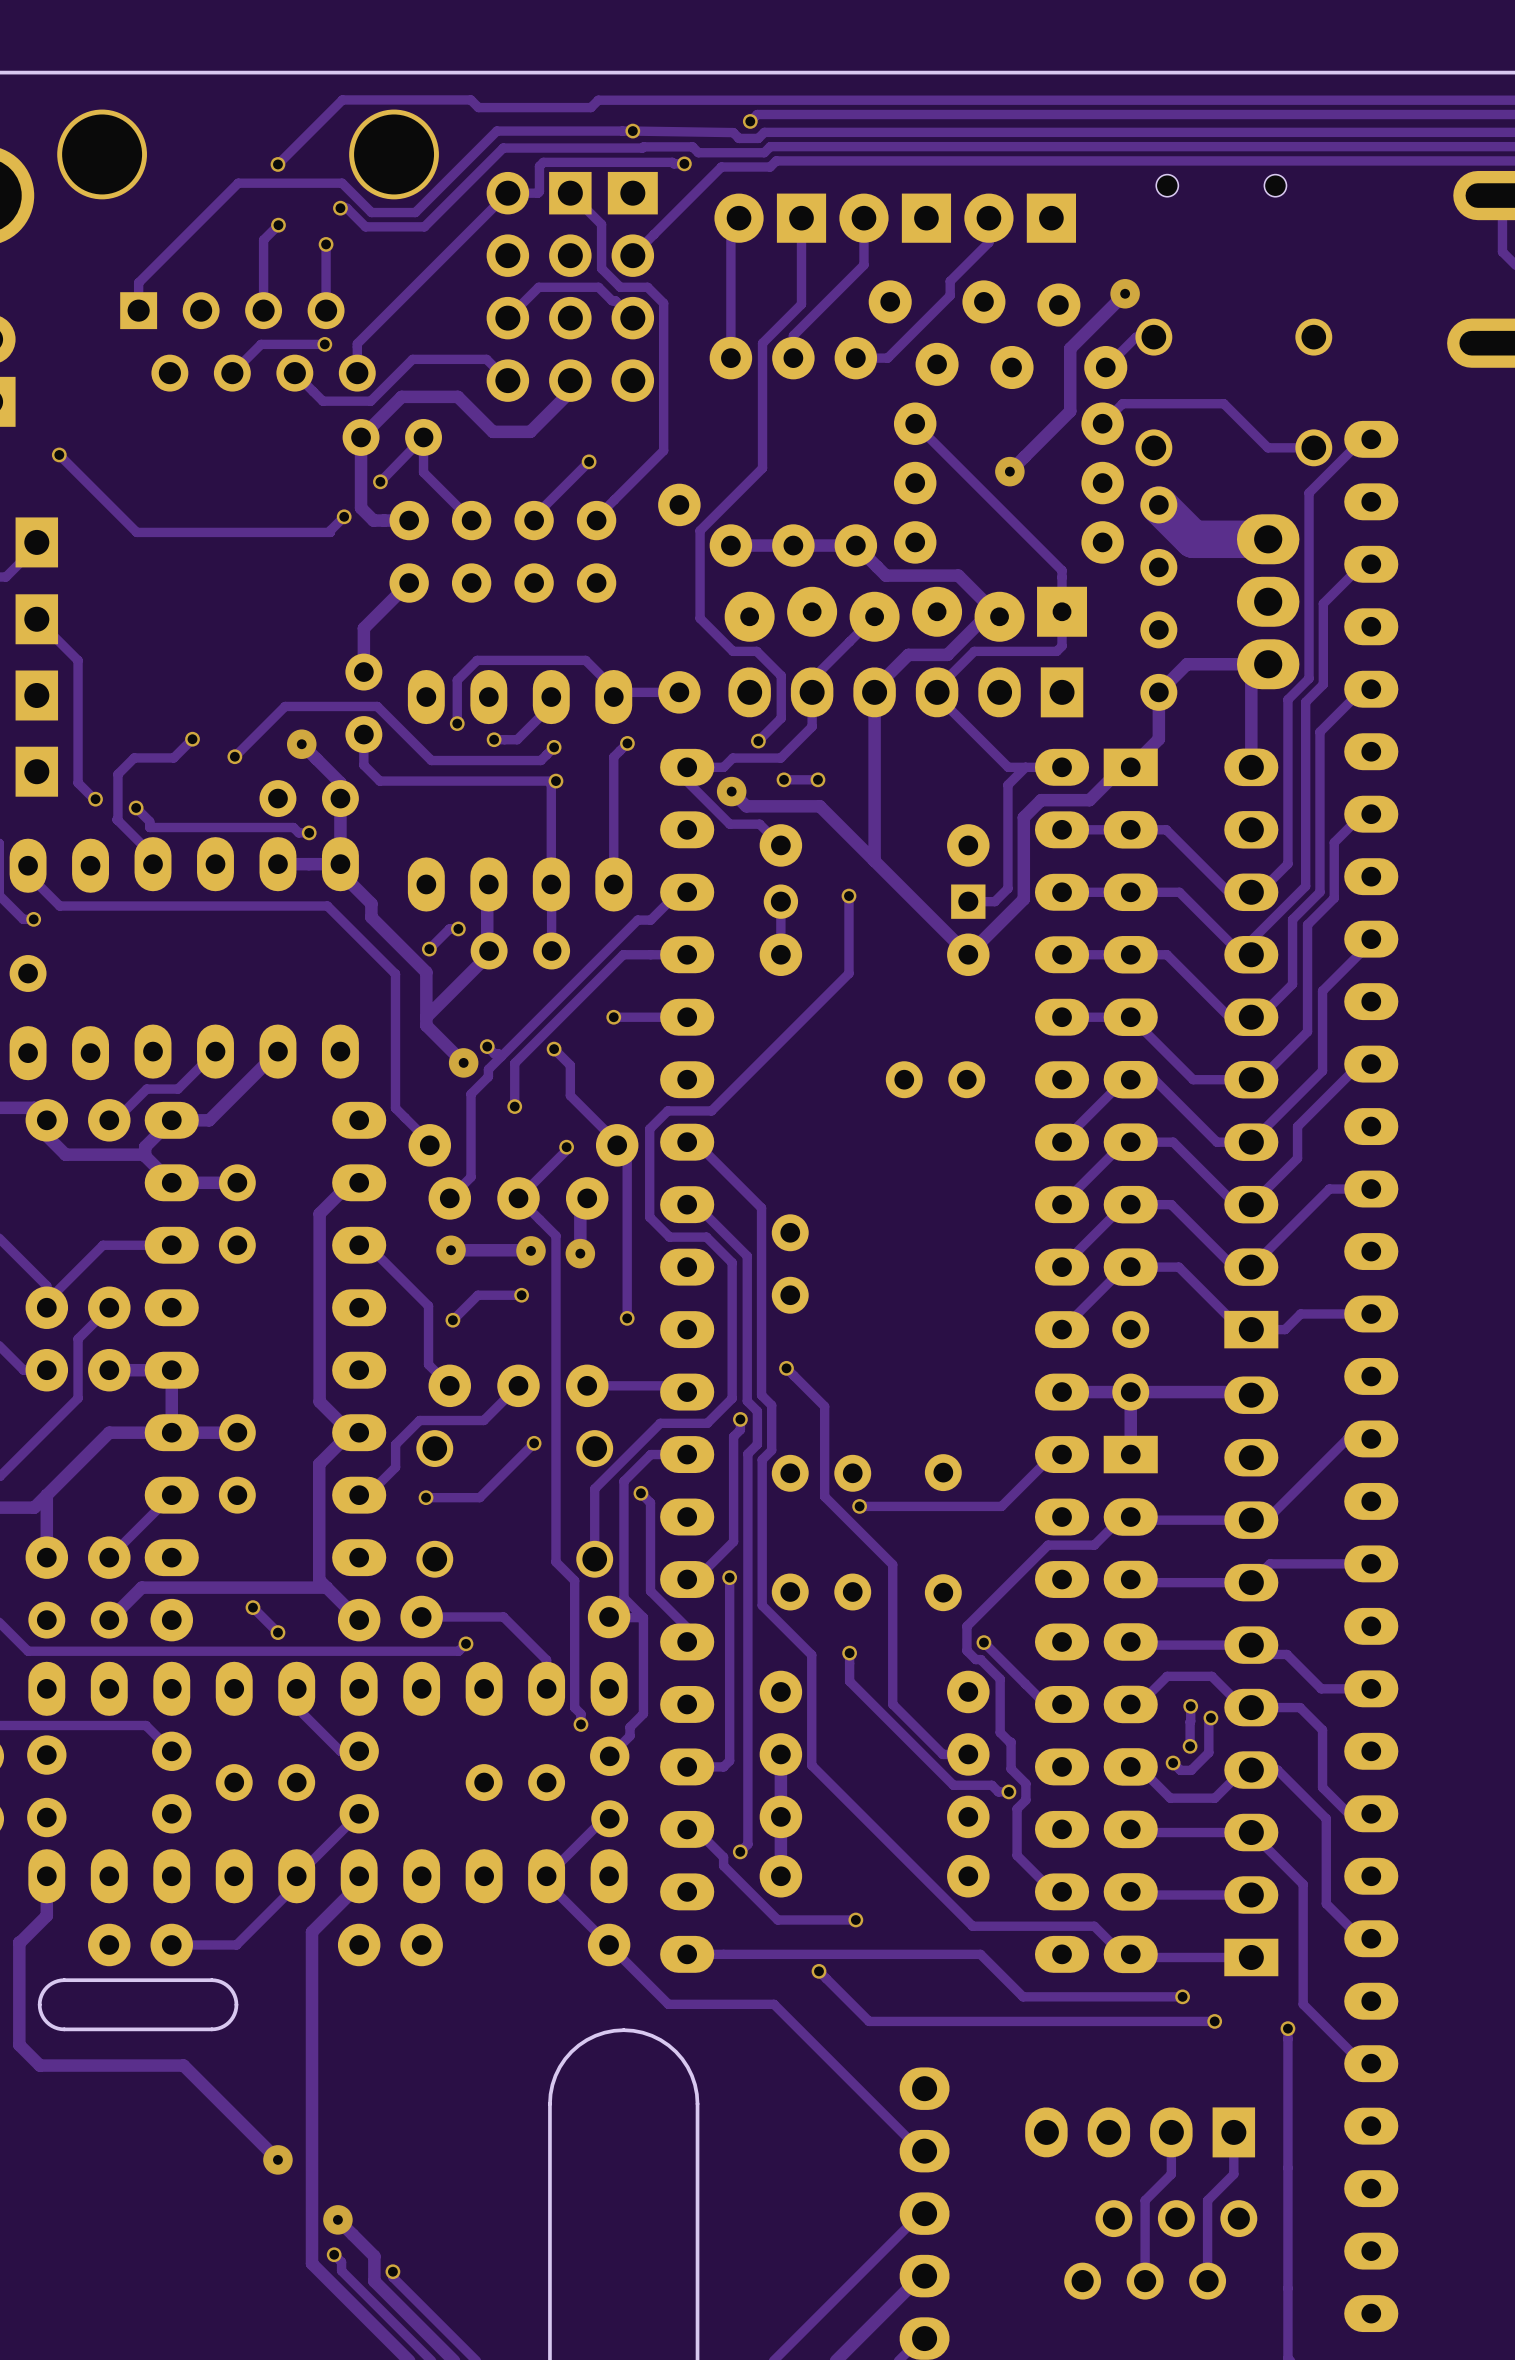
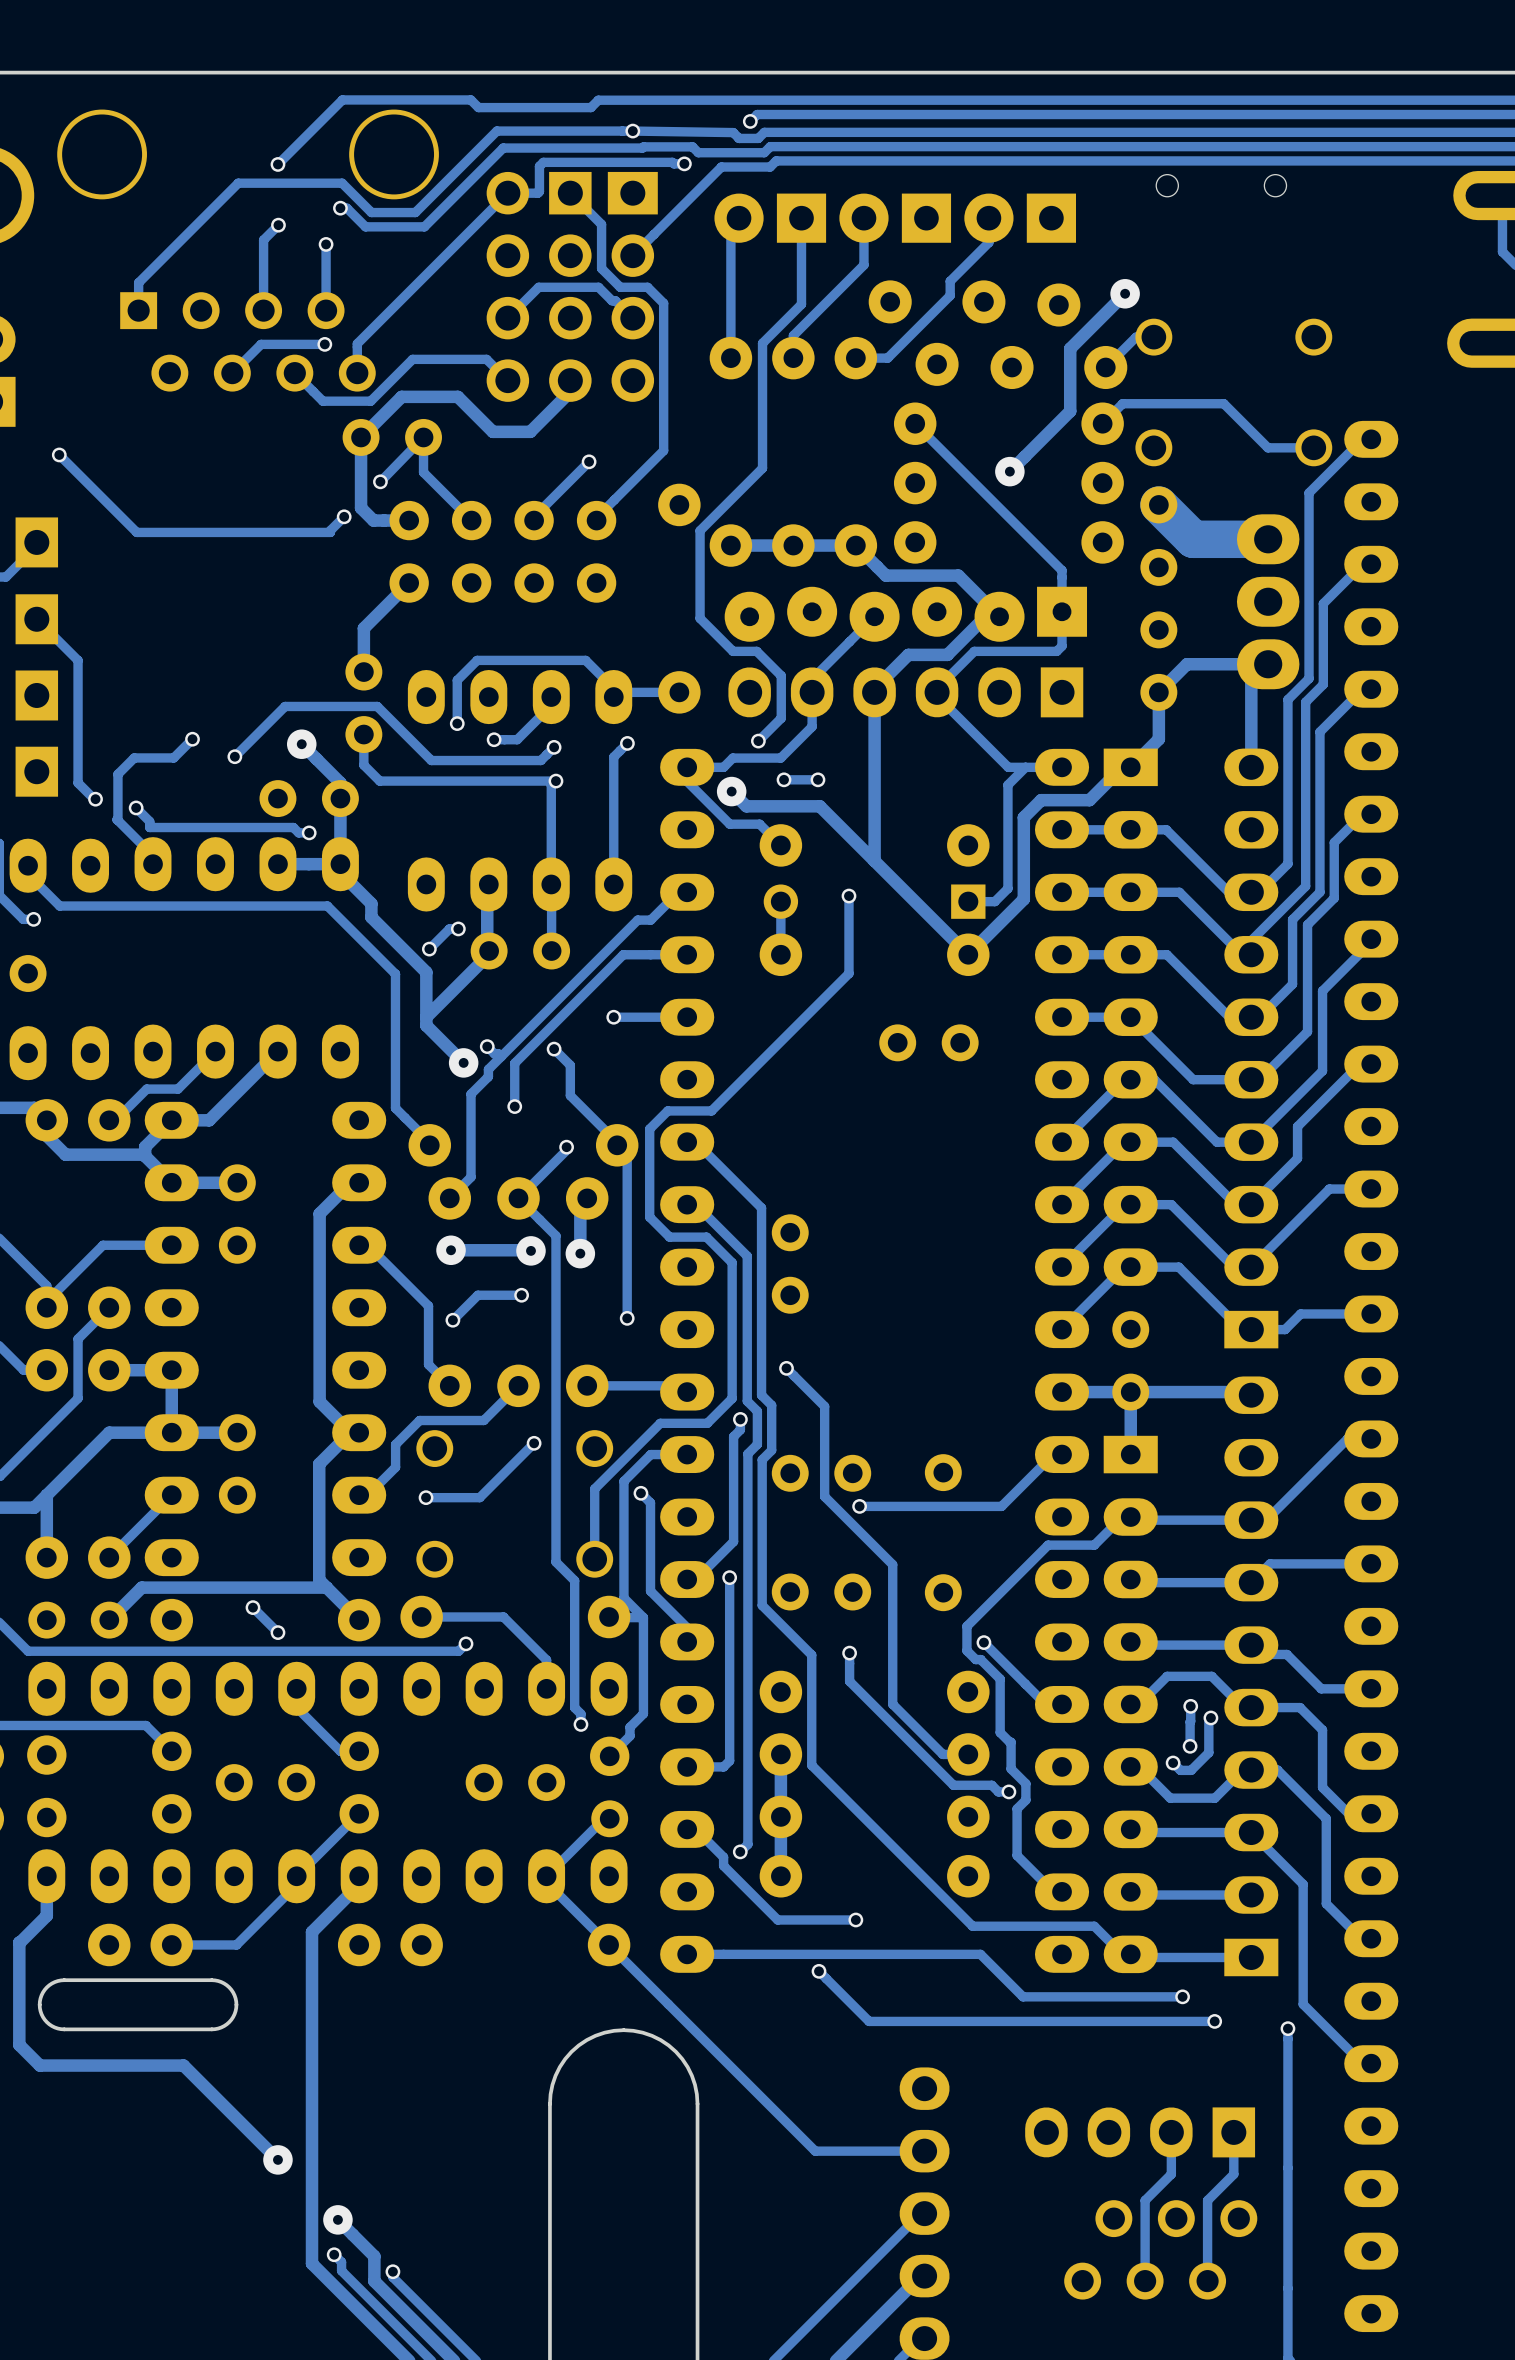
part position: (935, 1079) -> (928, 1042)
track: (668, 2004) (774, 2004) (920, 2151) -> (668, 2004) (815, 2151) (920, 2151)

